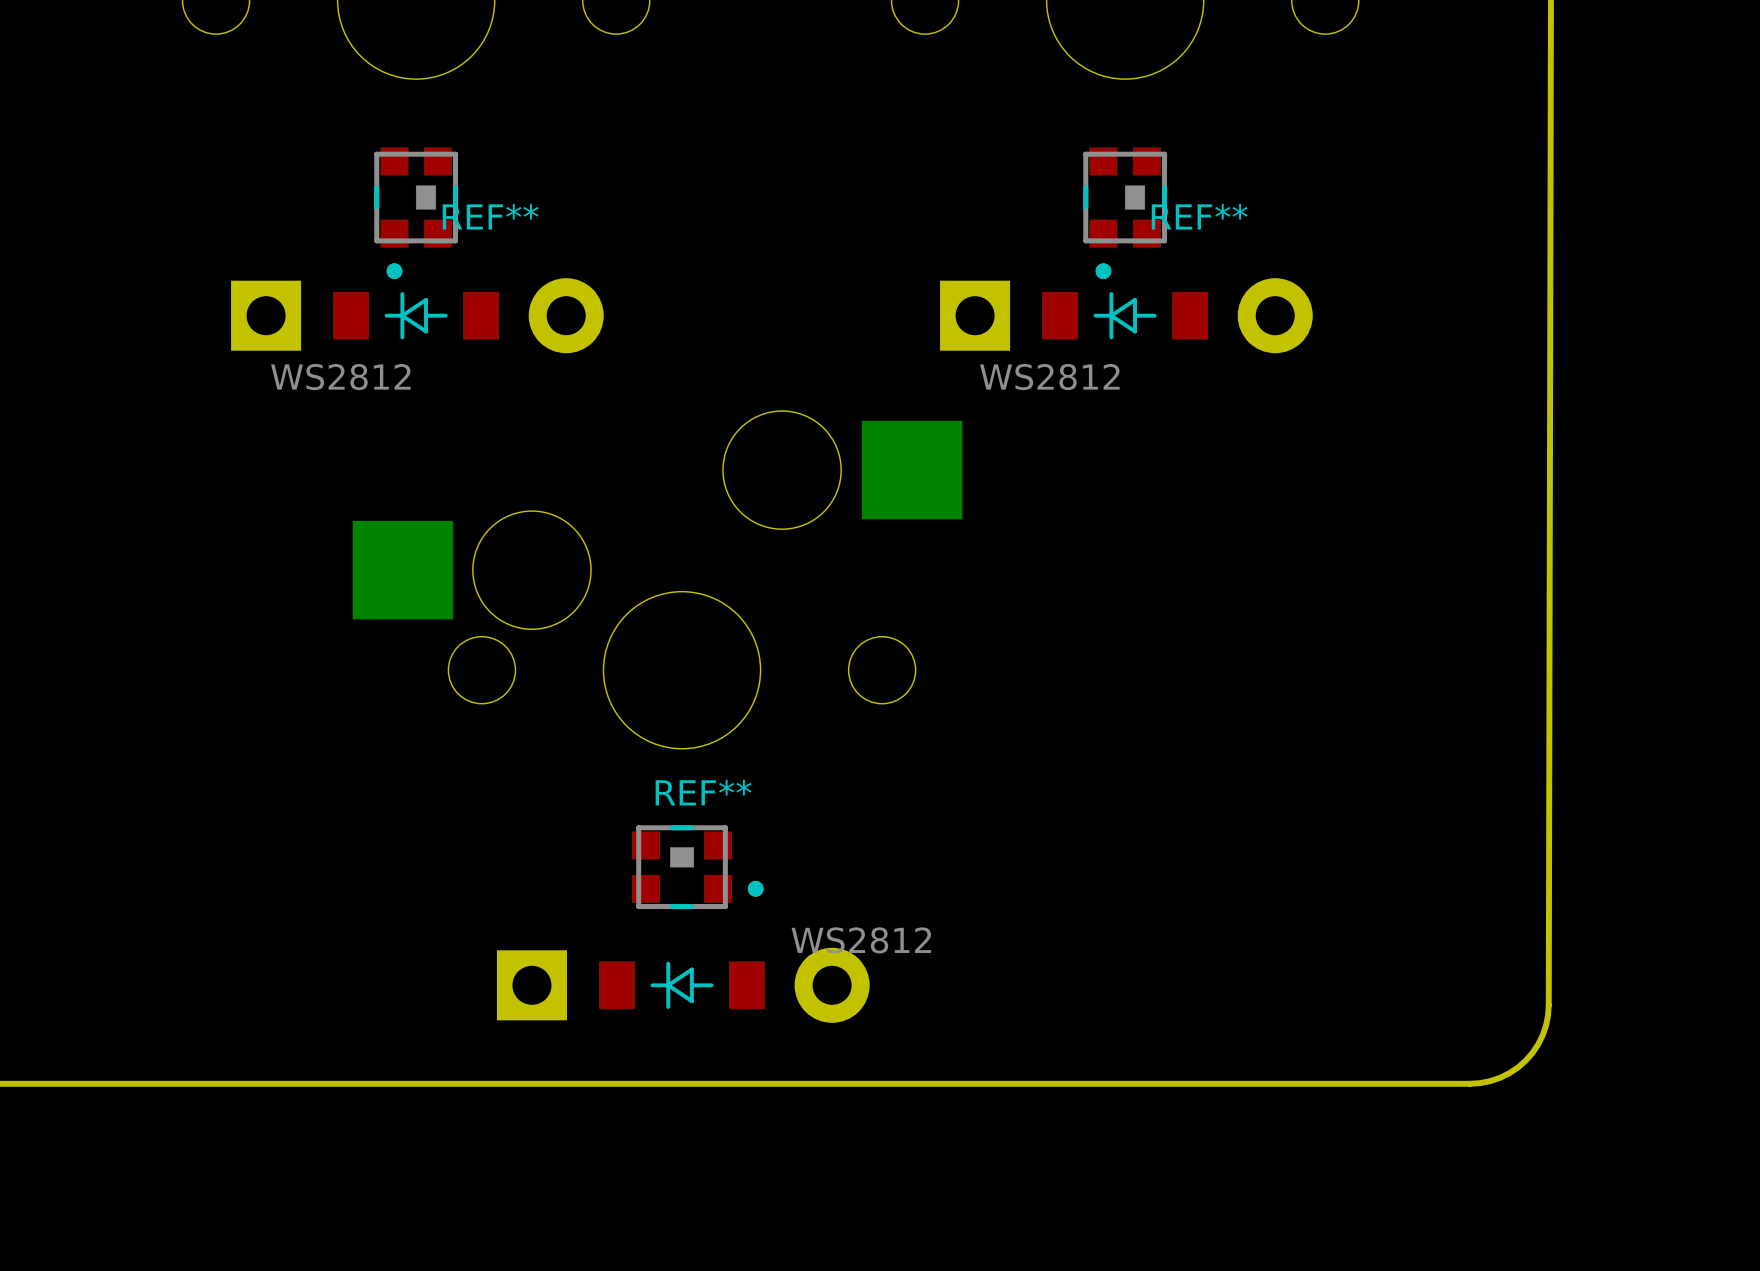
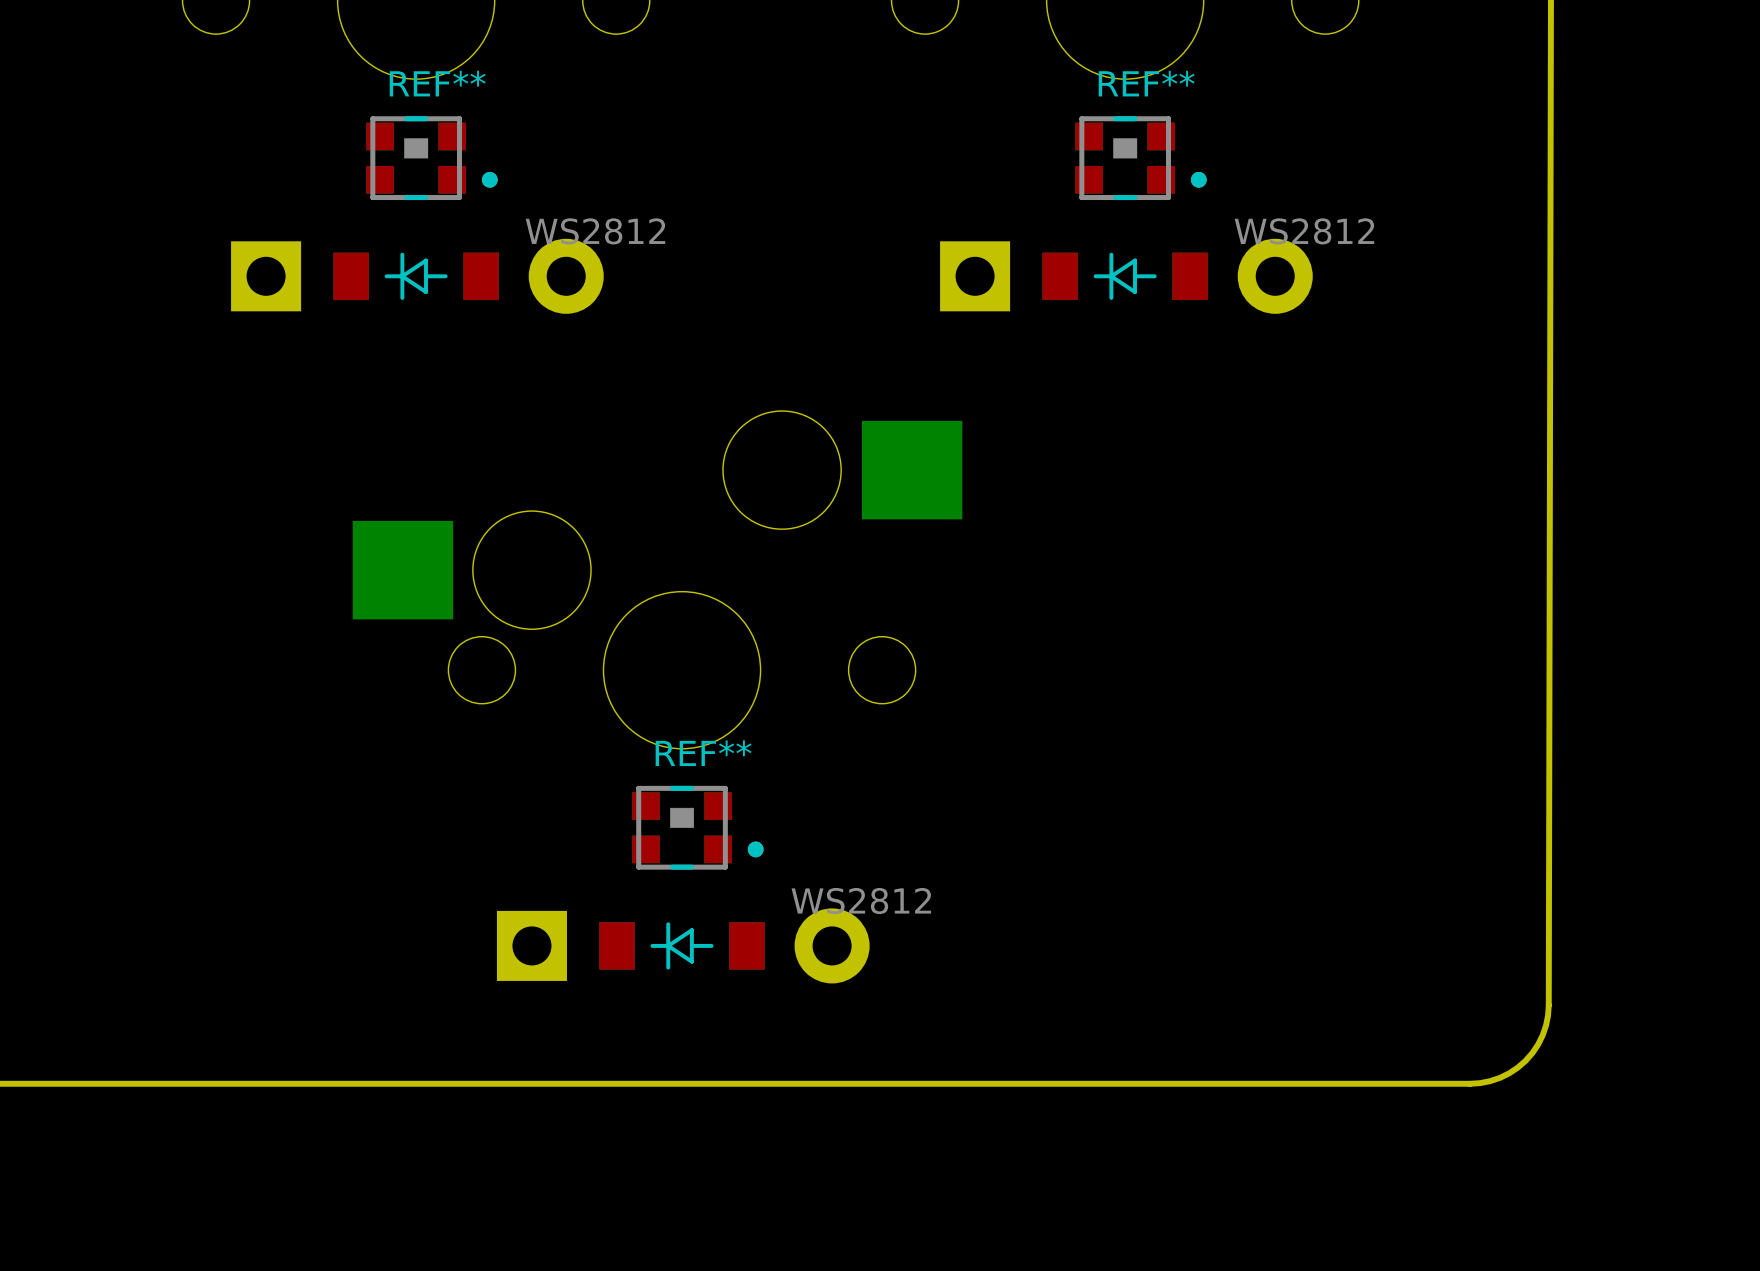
REF** rotation: 0° (416, 213) -> 90° counterclockwise (432, 158)
REF** rotation: 0° (1125, 213) -> 90° counterclockwise (1141, 158)
part position: (417, 315) -> (417, 276)
part position: (1126, 315) -> (1126, 276)
REF** position: (697, 867) -> (697, 827)
part position: (683, 985) -> (683, 945)

